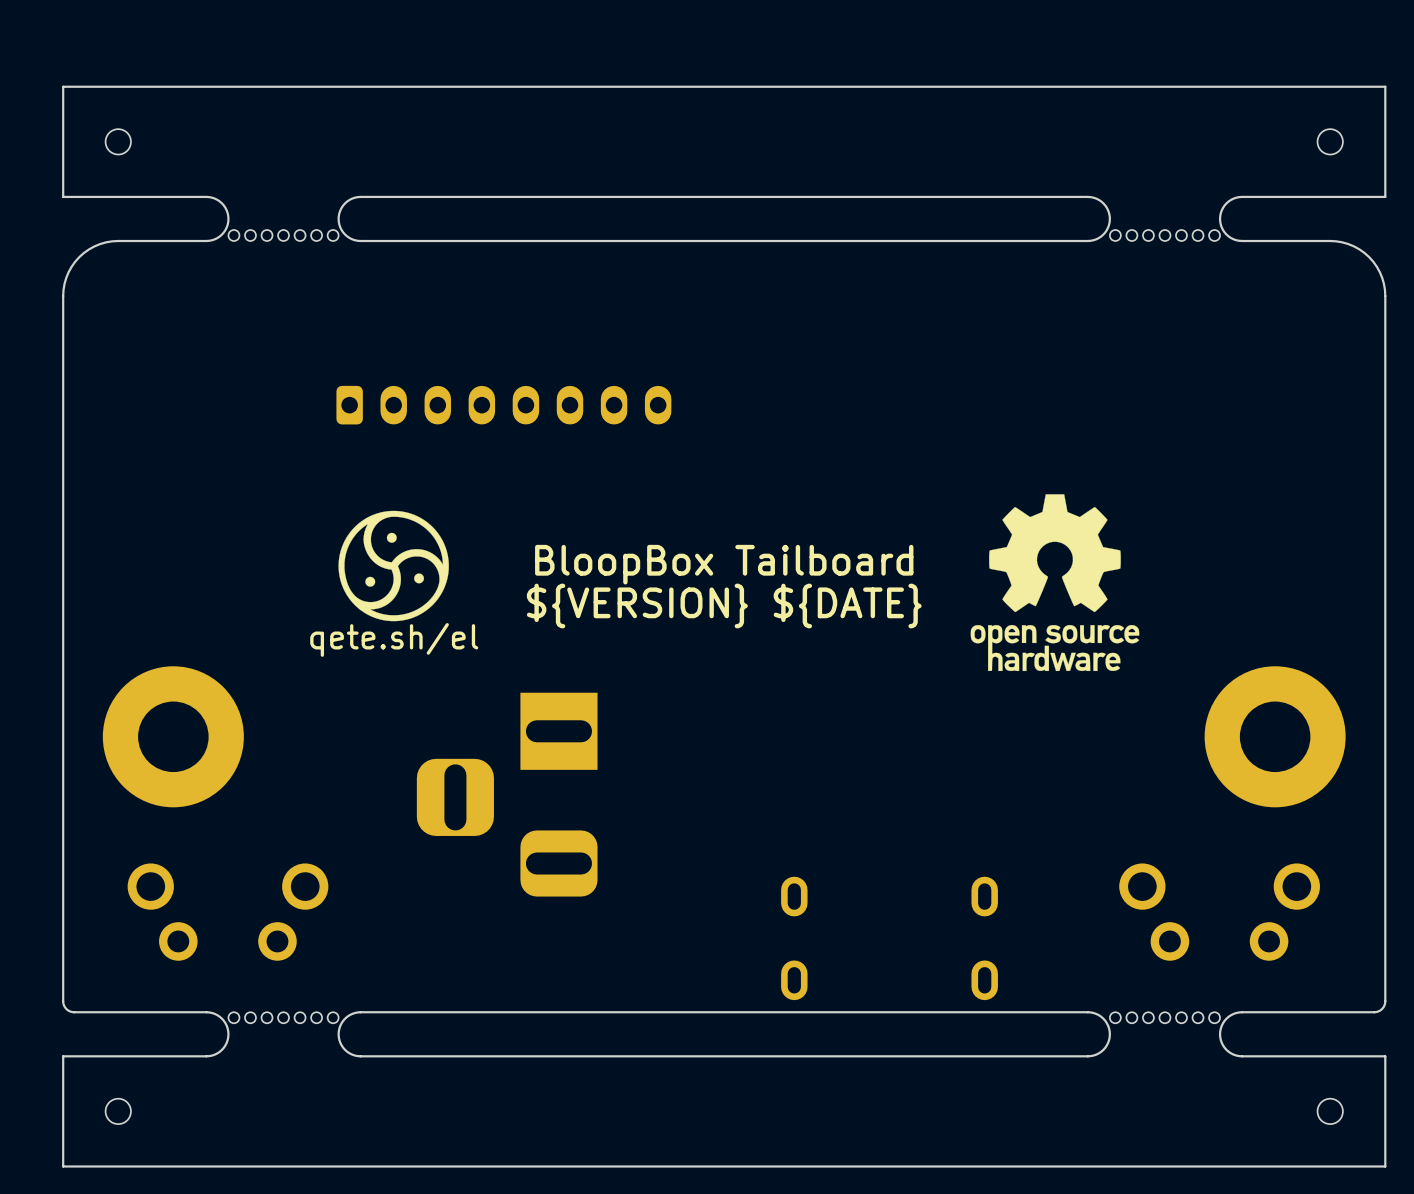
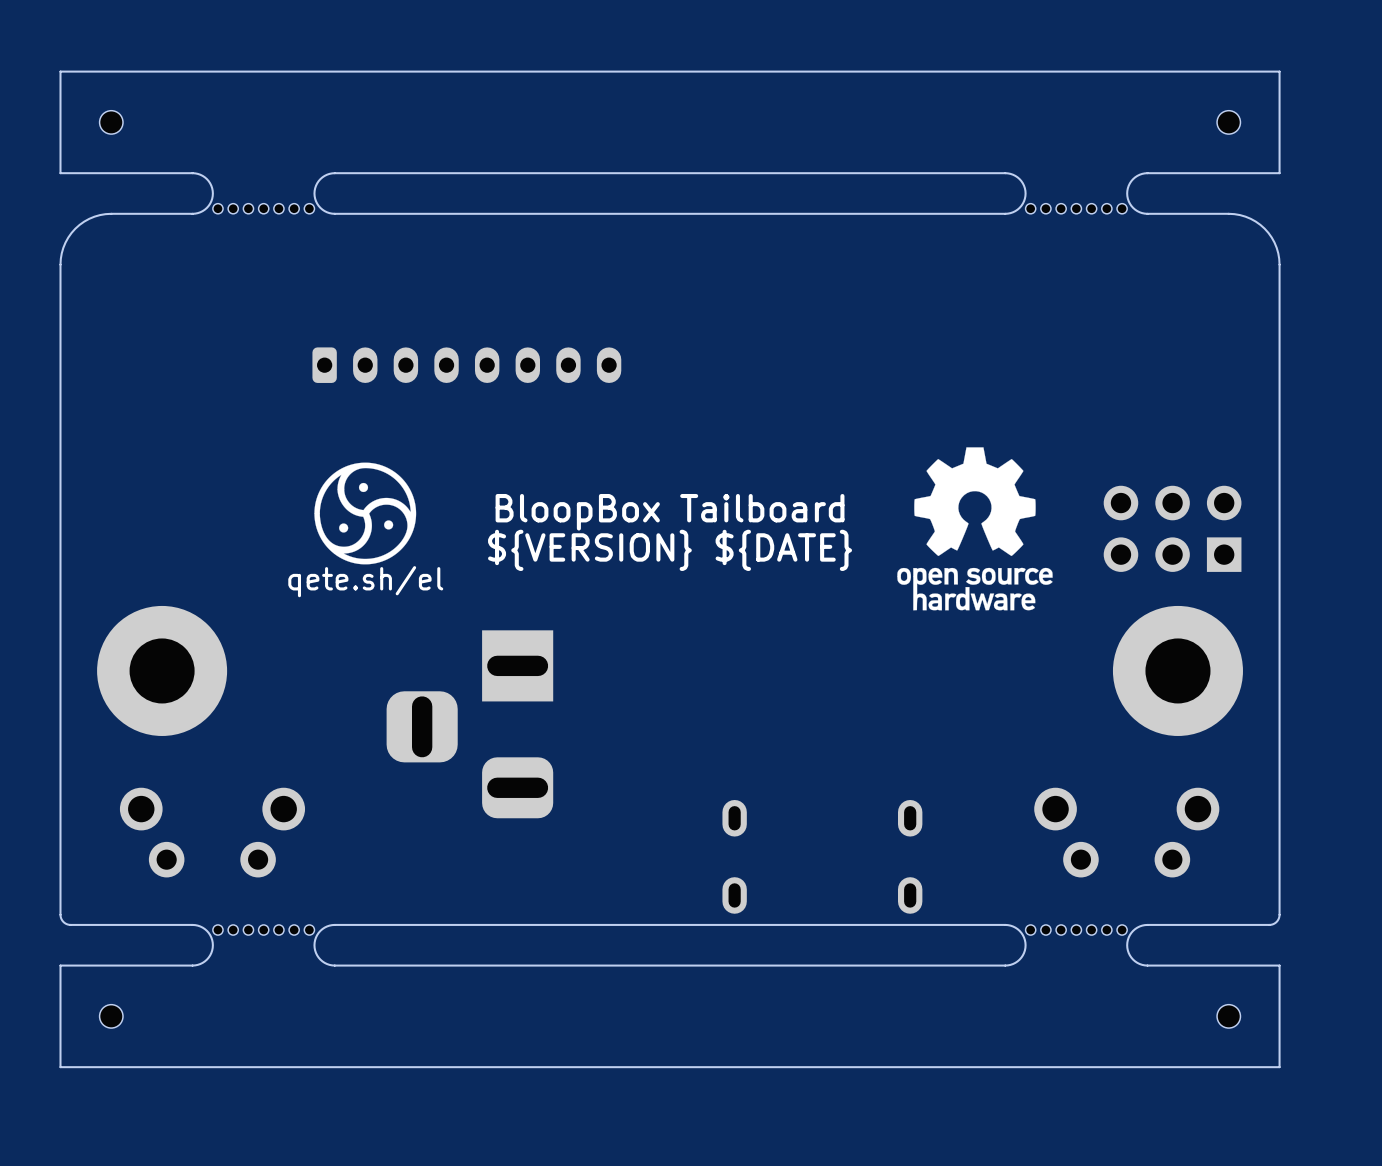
part: none -> (1172, 528)

